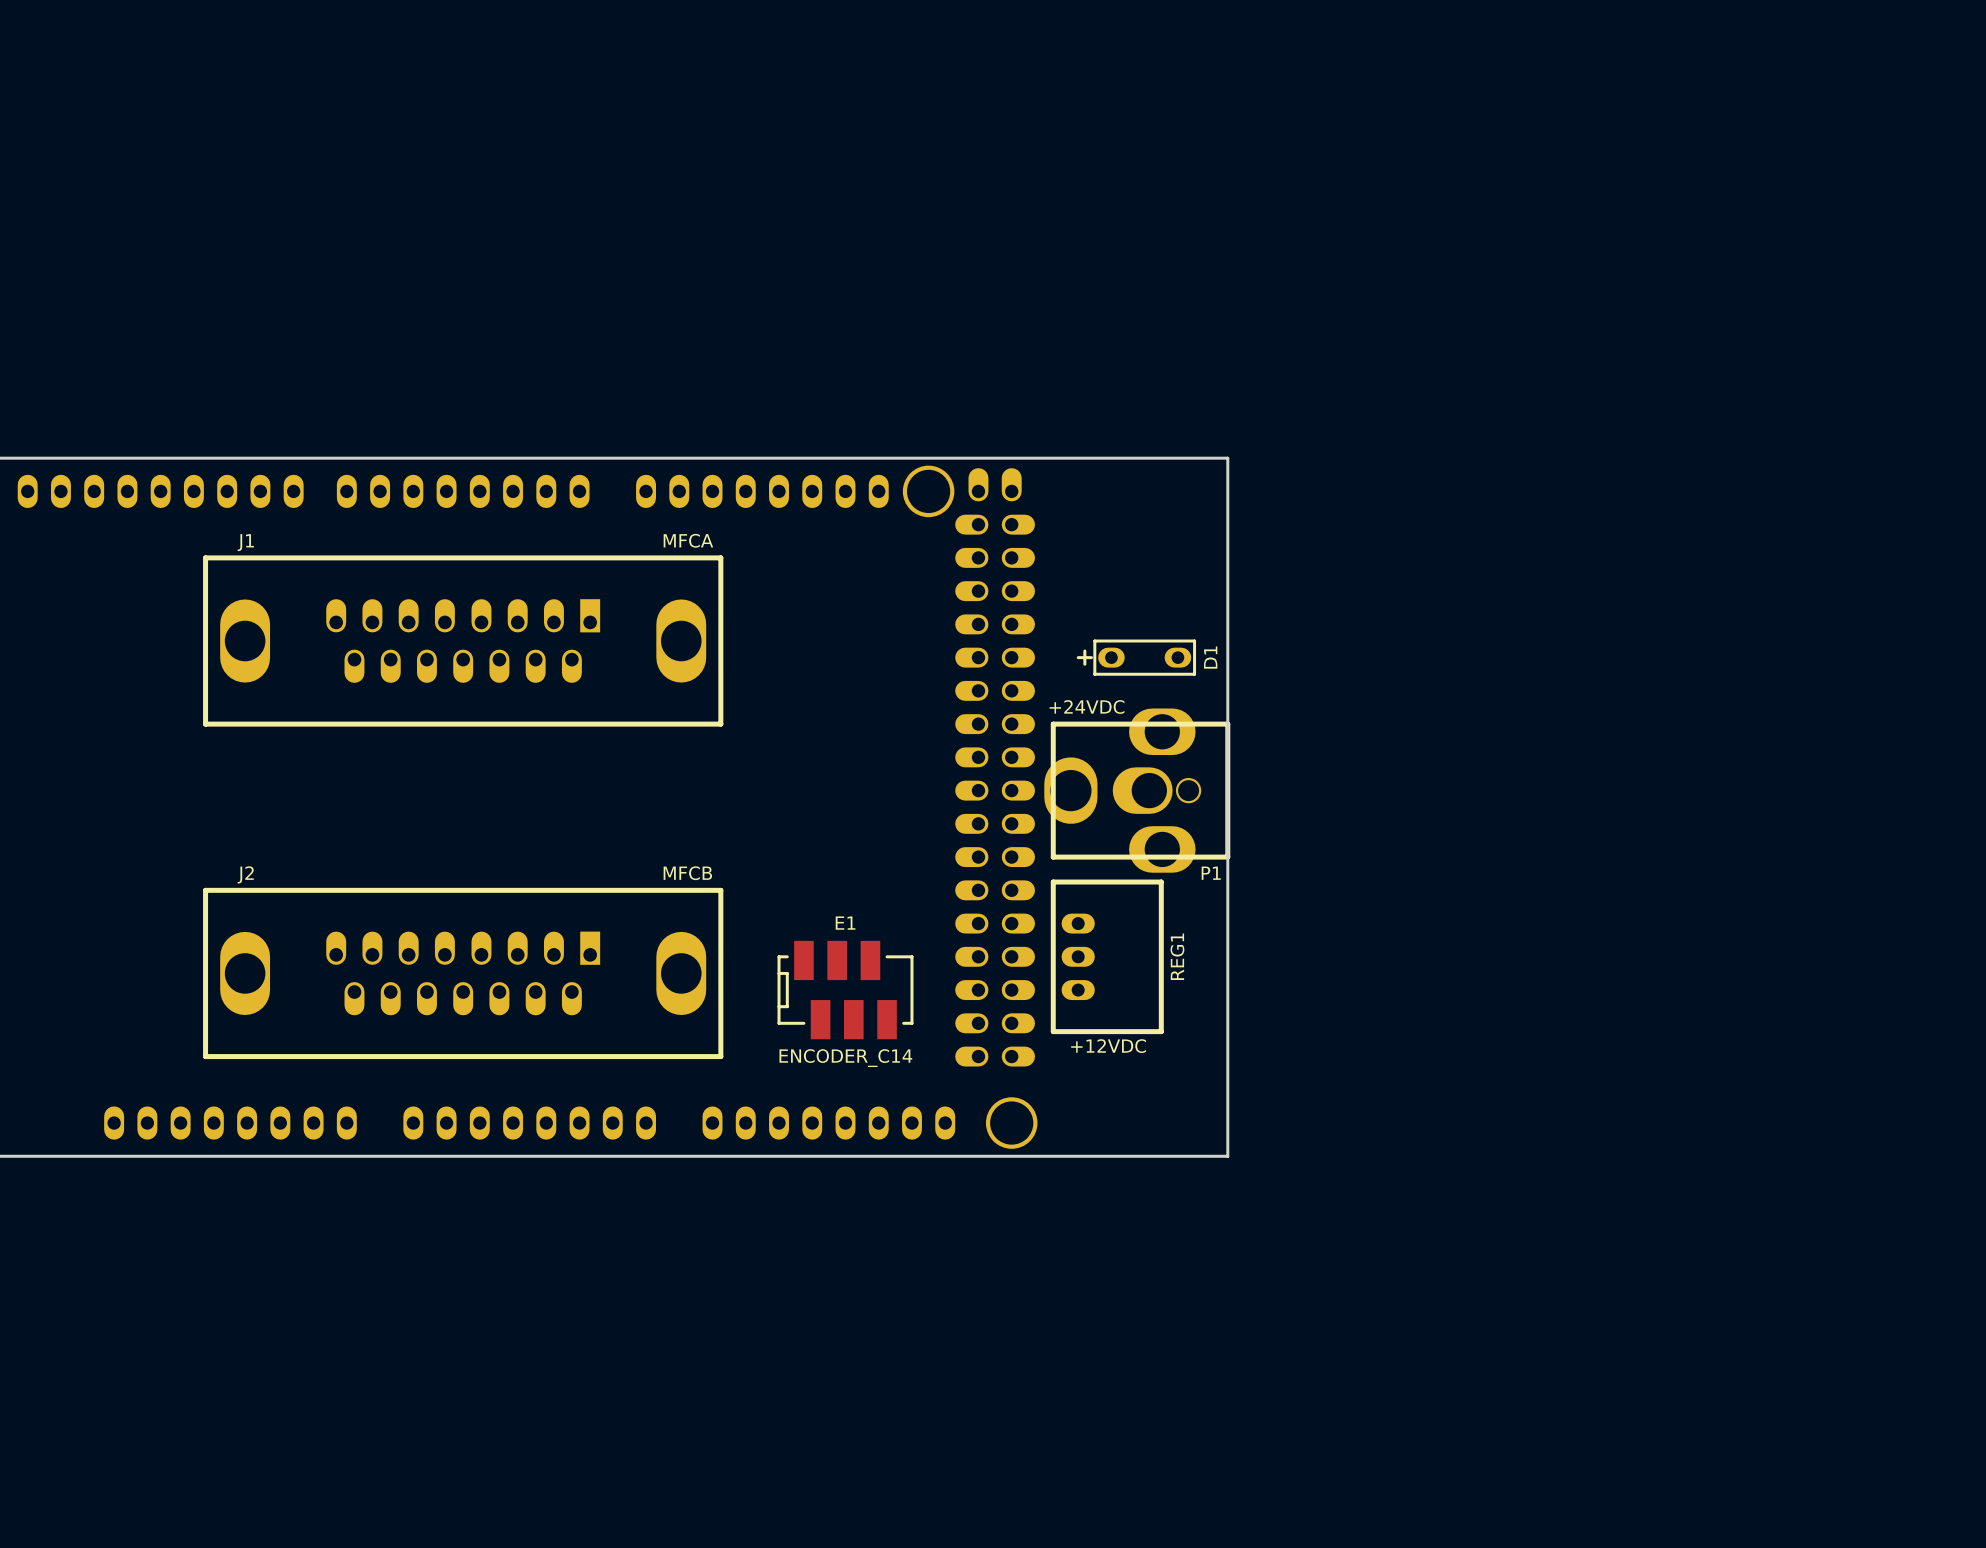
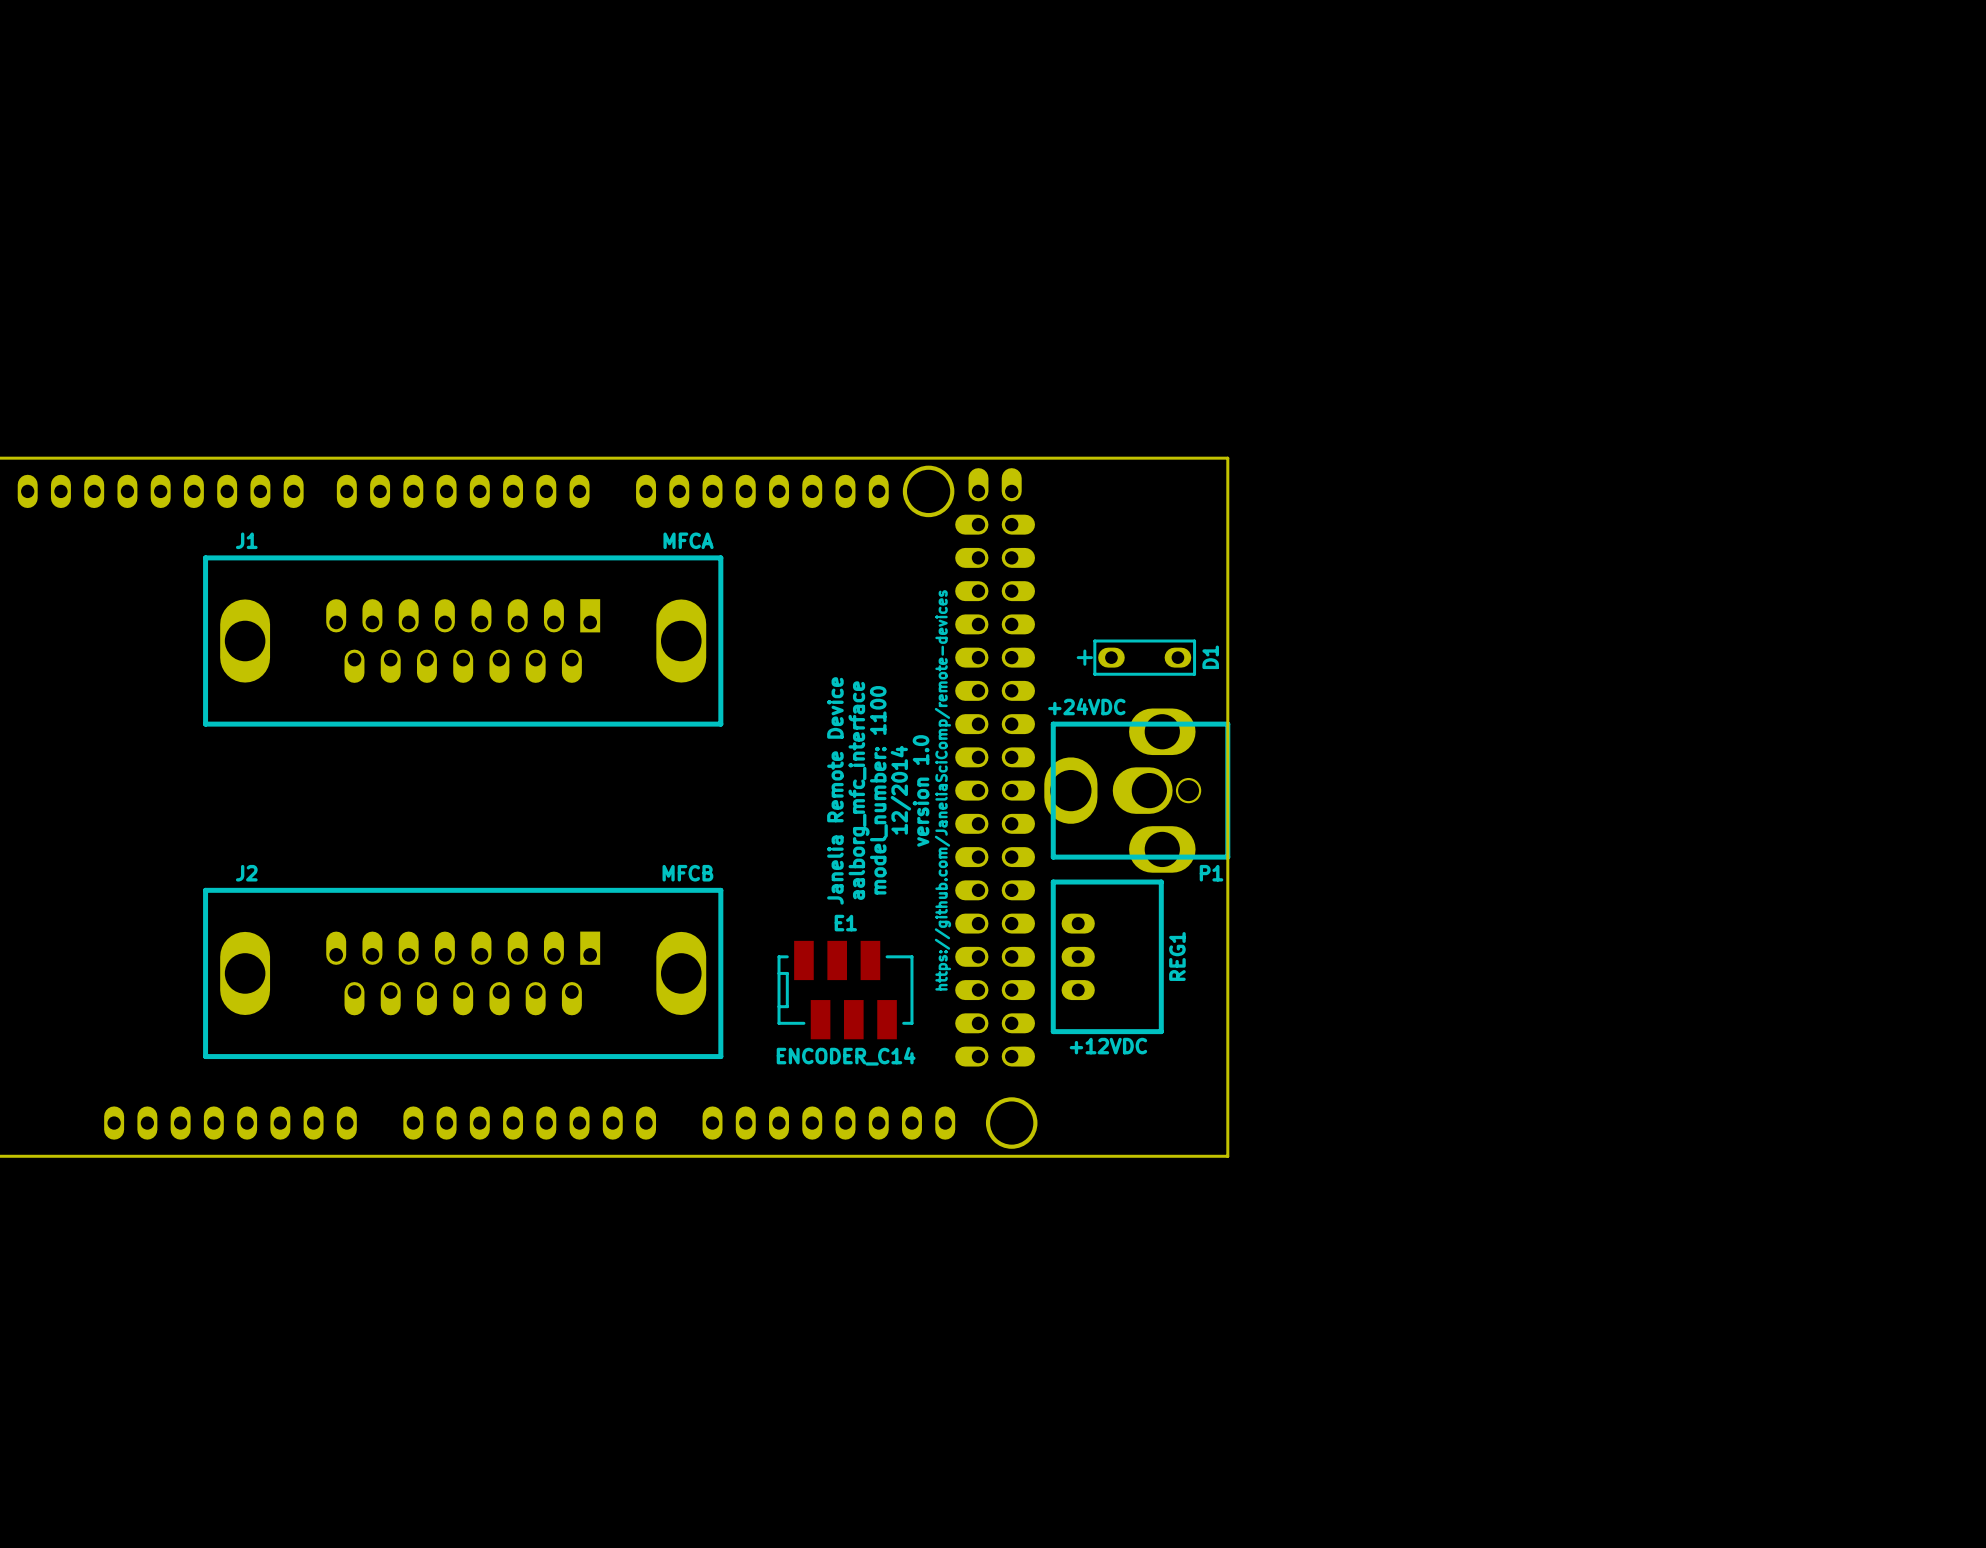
text: none -> aalborg_mfc_interface (859, 790)
text: none -> model_number: 1100 (878, 790)
text: none -> 12/2014 (900, 790)
text: none -> version 1.0 (921, 790)
text: none -> https://github.com/JaneliaSciComp/remote-devices (942, 790)
text: none -> Janelia Remote Device (835, 790)

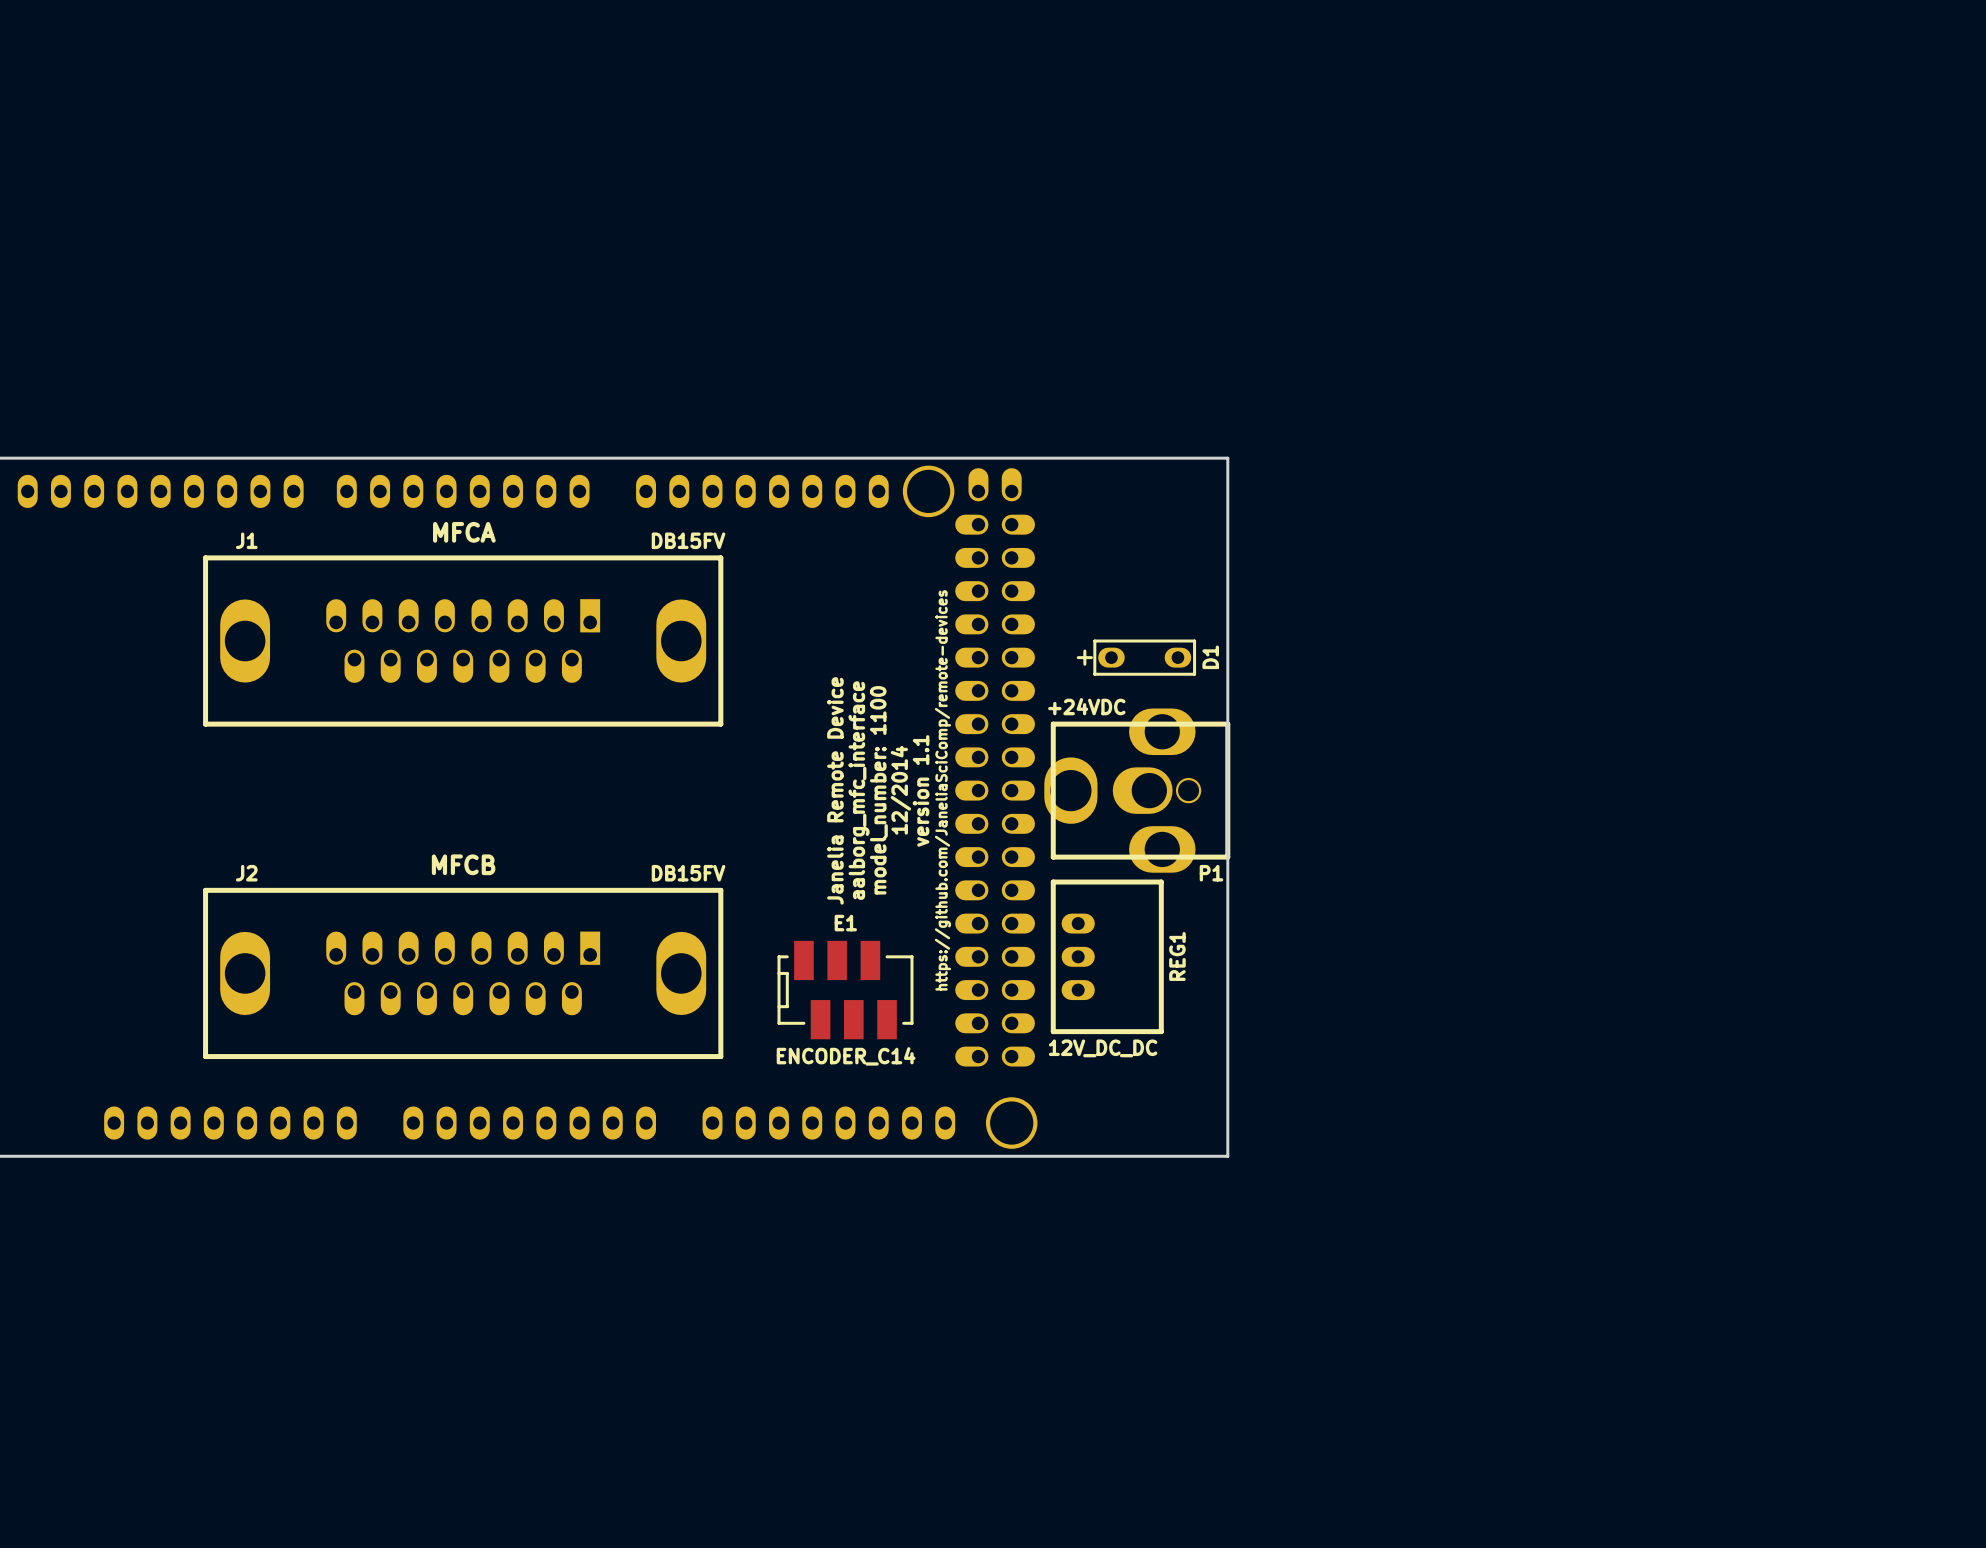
text: none -> MFCA (464, 532)
J1 value: MFCA (688, 540) -> DB15FV (688, 540)
text: version 1.0 (921, 790) -> version 1.1 (921, 790)
text: none -> MFCB (463, 864)
J2 value: MFCB (687, 873) -> DB15FV (688, 873)
REG1 value: +12VDC (1108, 1046) -> none
text: none -> 12V_DC_DC (1103, 1048)

